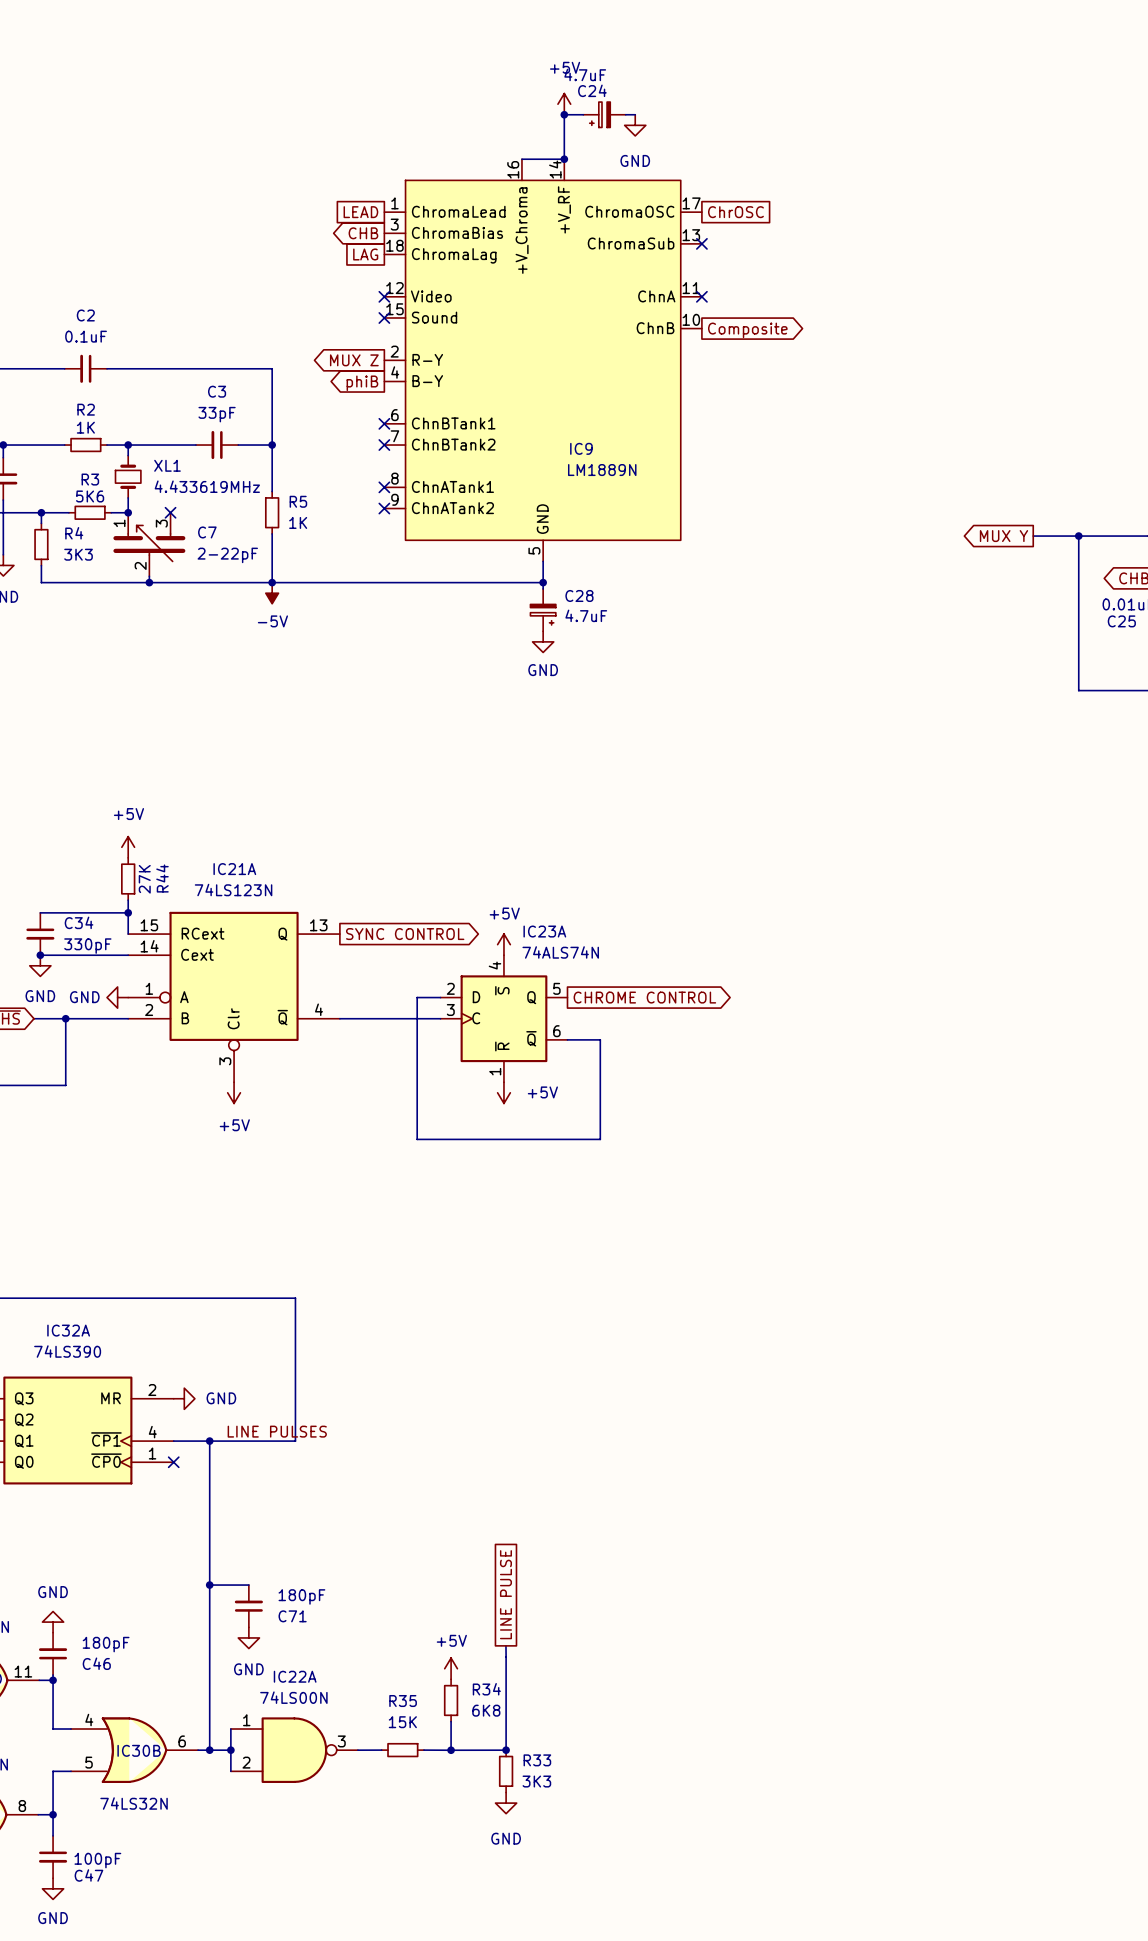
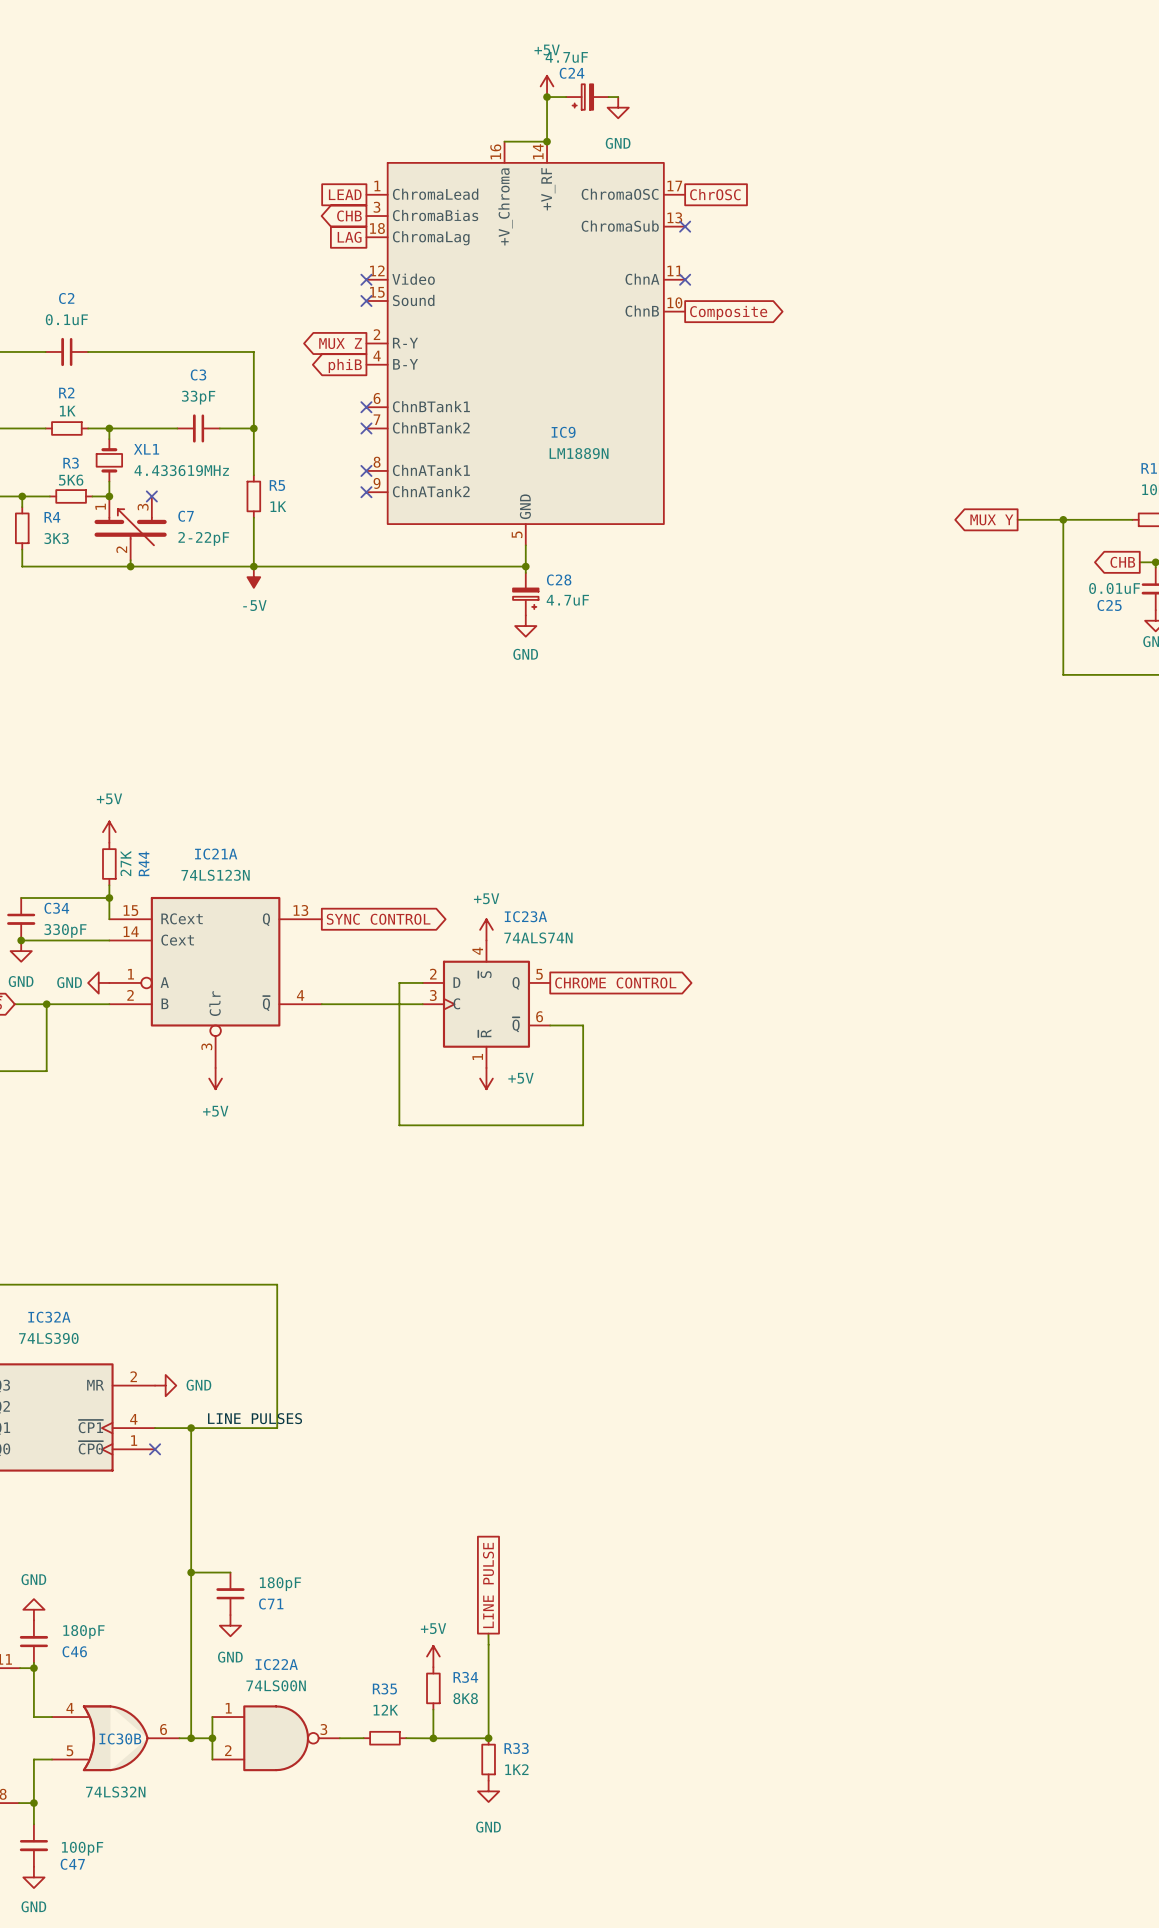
R34 value: 6K8 (486, 1710) -> 8K8 (465, 1698)
R35 value: 15K (402, 1722) -> 12K (385, 1710)
R33 value: 3K3 (536, 1781) -> 1K2 (516, 1769)

